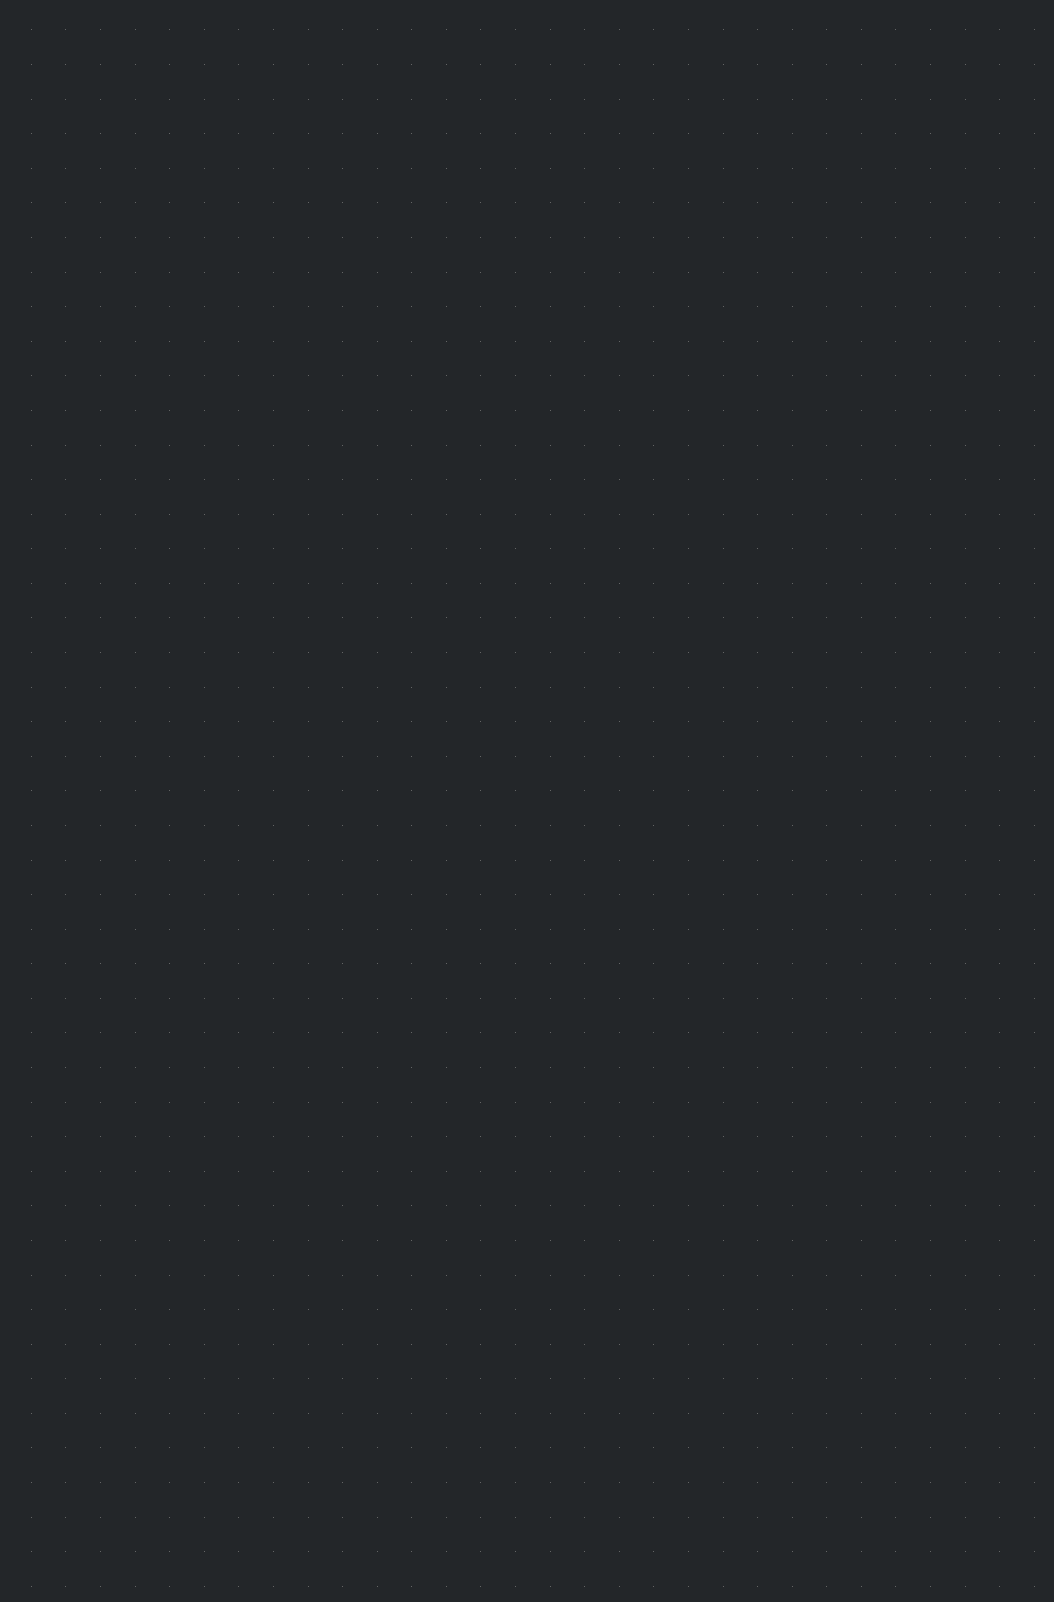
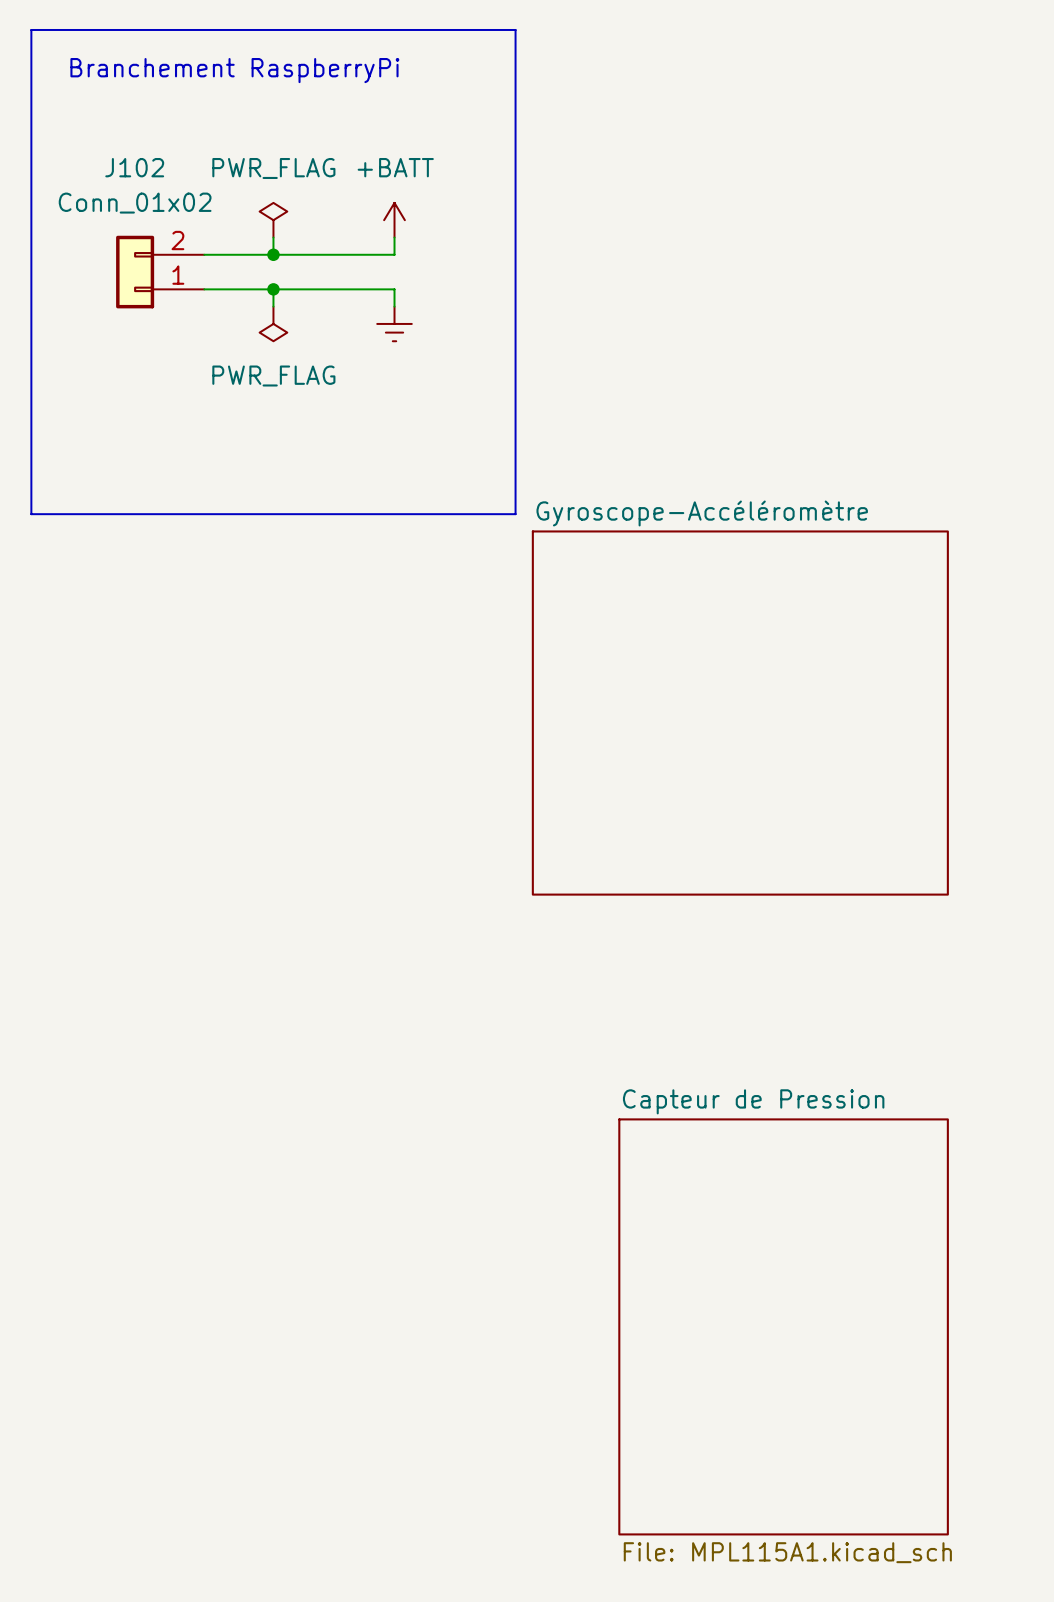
line: none -> (31, 29) (515, 29) (515, 514) (31, 514) (31, 29)
text: none -> Branchement RaspberryPi (234, 70)
power symbol: none -> PWR_FLAG (273, 220)
power symbol: none -> +BATT (394, 220)
wire: none -> (273, 237) (273, 254)
wire: none -> (394, 237) (394, 254) (204, 254)
junction: none -> (273, 254)
J102: none -> Conn_01x02 (160, 272)
wire: none -> (204, 289) (394, 289) (394, 306)
wire: none -> (273, 289) (273, 306)
junction: none -> (273, 289)
power symbol: none -> PWR_FLAG (273, 323)
power symbol: none -> (394, 323)
sheet Gyroscope-Accéléromètre: none -> (740, 713)
sheet Capteur de Pression: none -> File: MPL115A1.kicad_sch (783, 1326)

